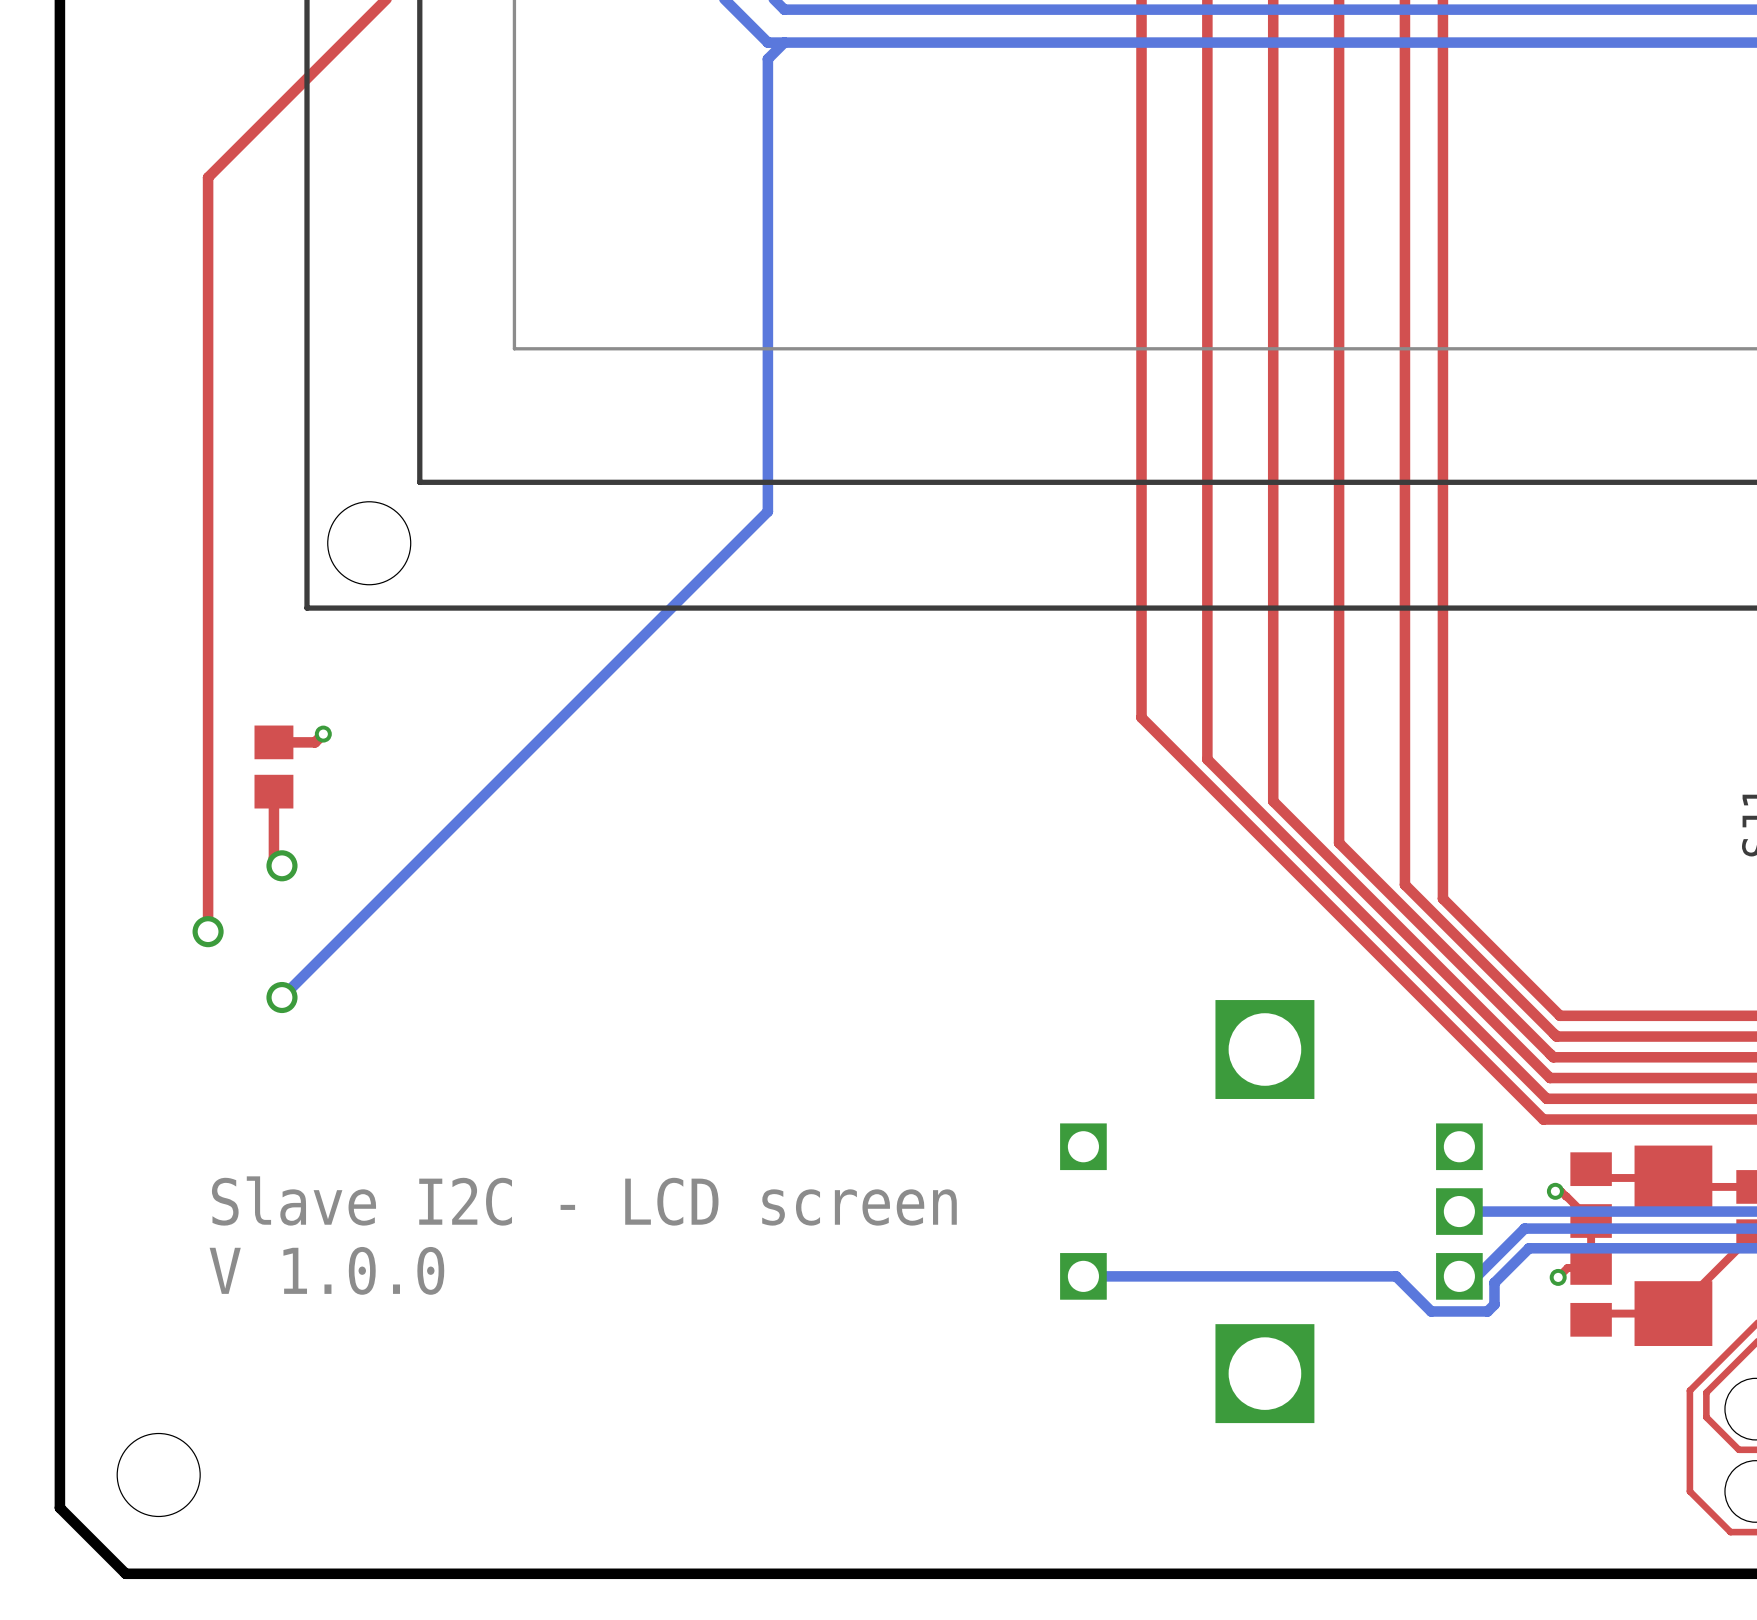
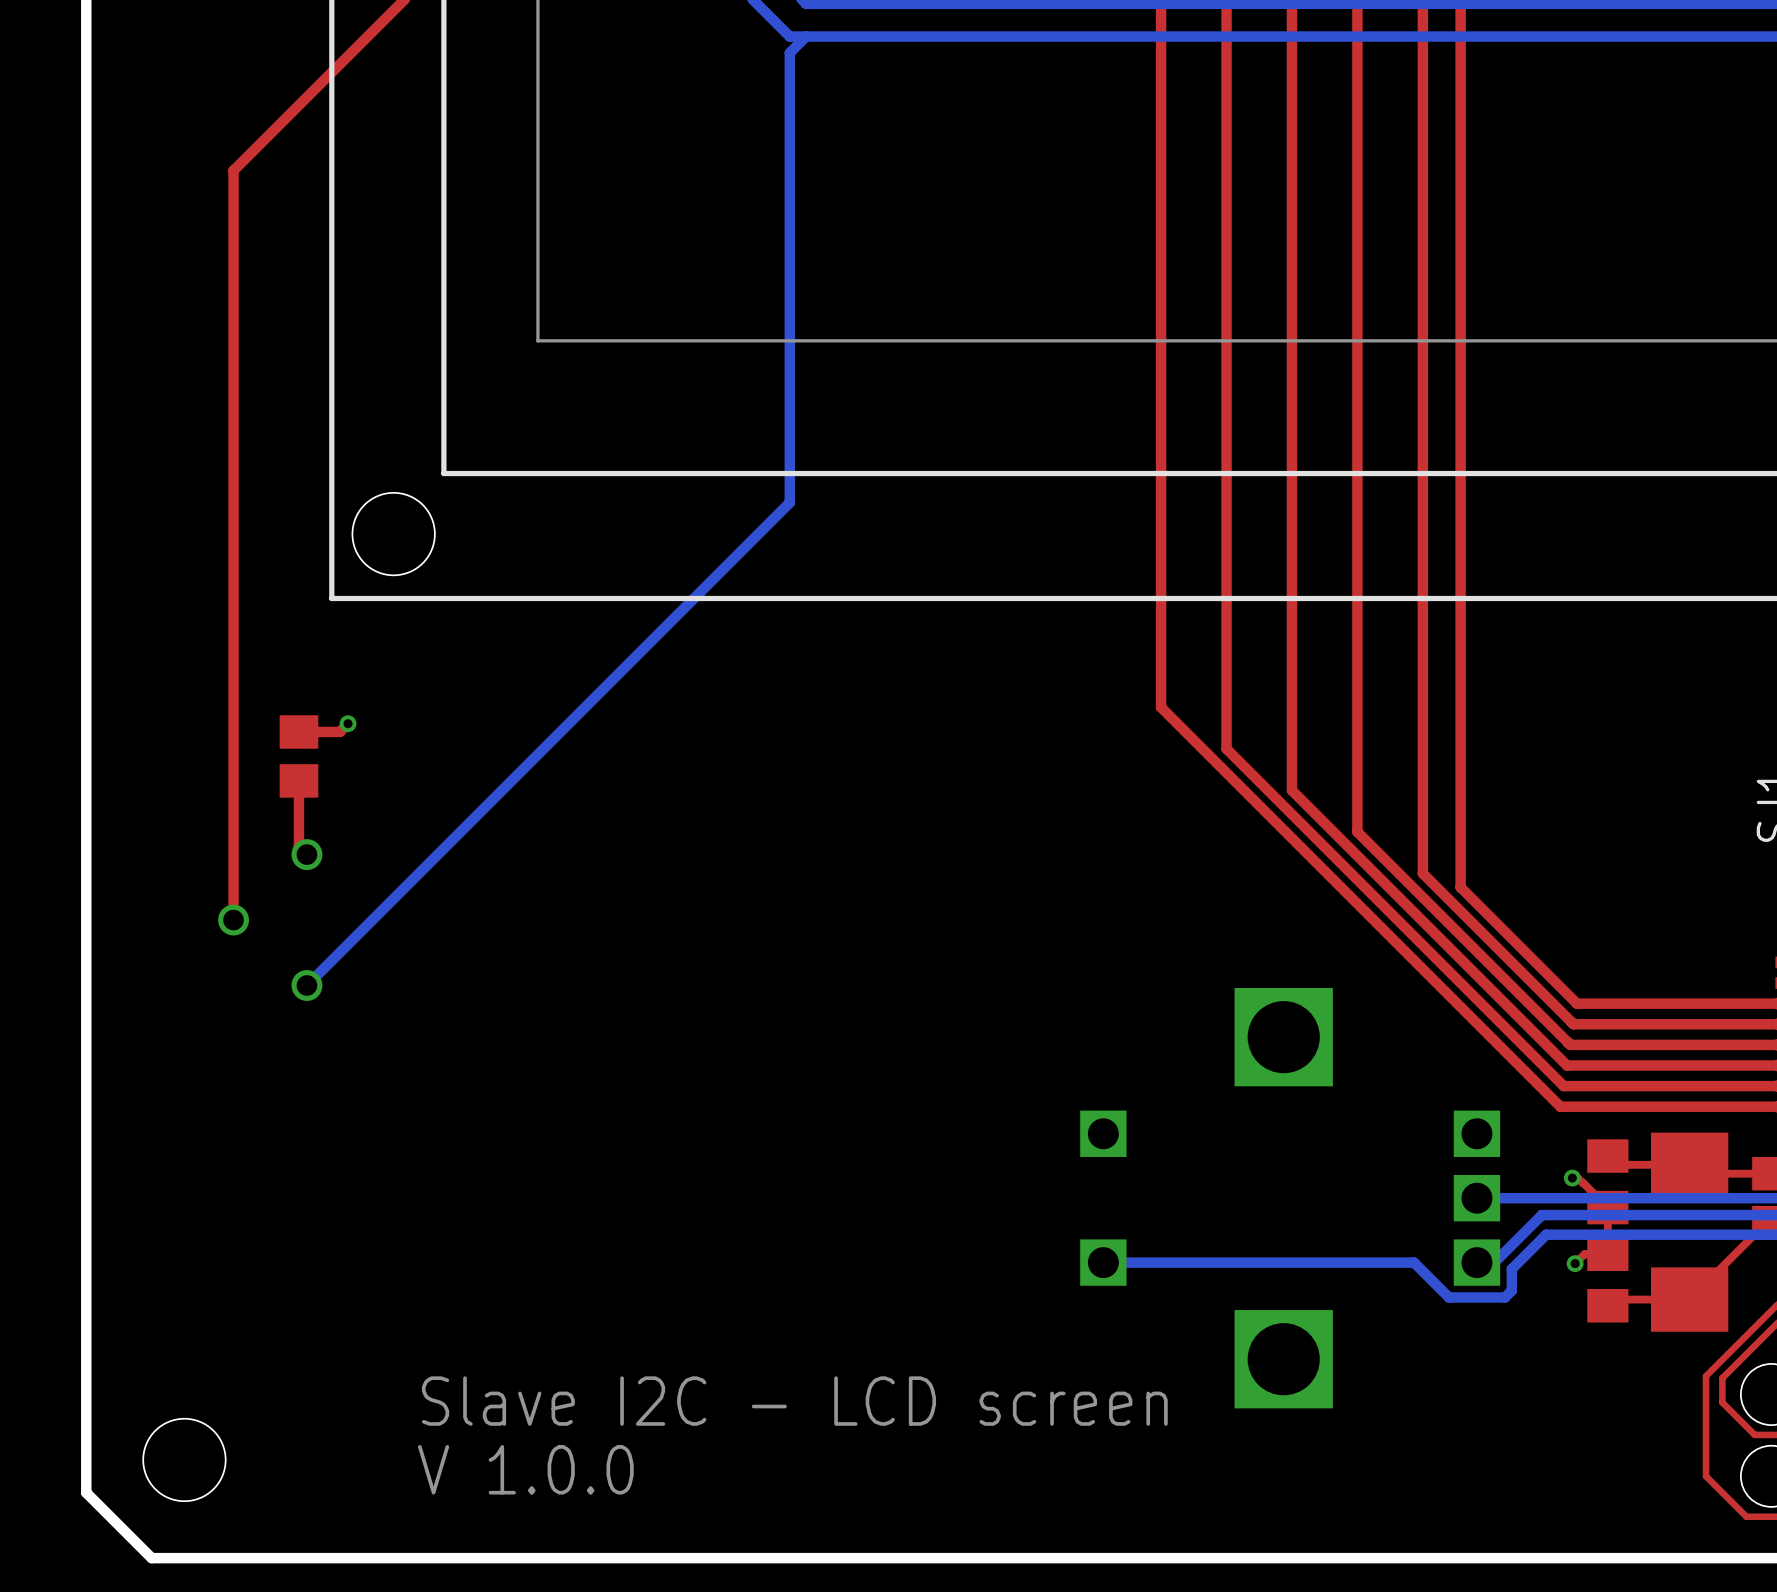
text position: Slave I2C - LCD screen (584, 1200) -> Slave I2C - LCD screen (794, 1401)
text position: V 1.0.0 (326, 1270) -> V 1.0.0 (525, 1469)

